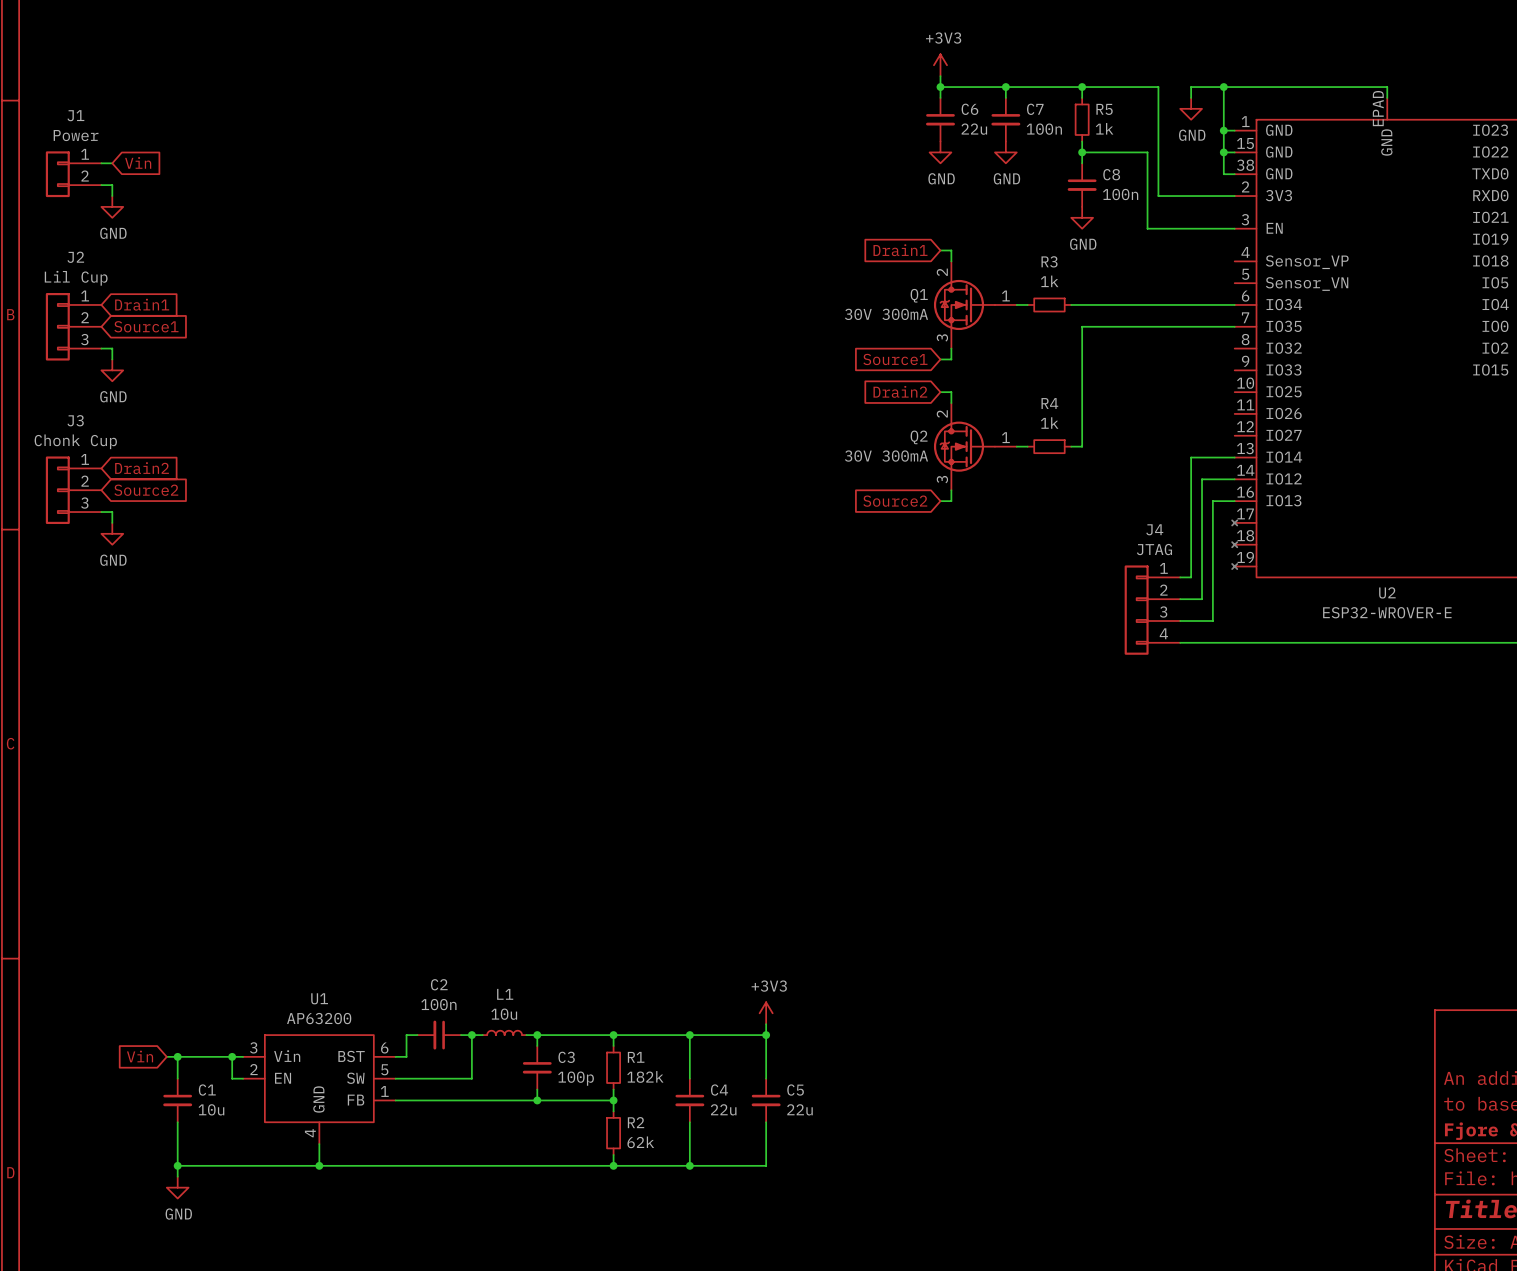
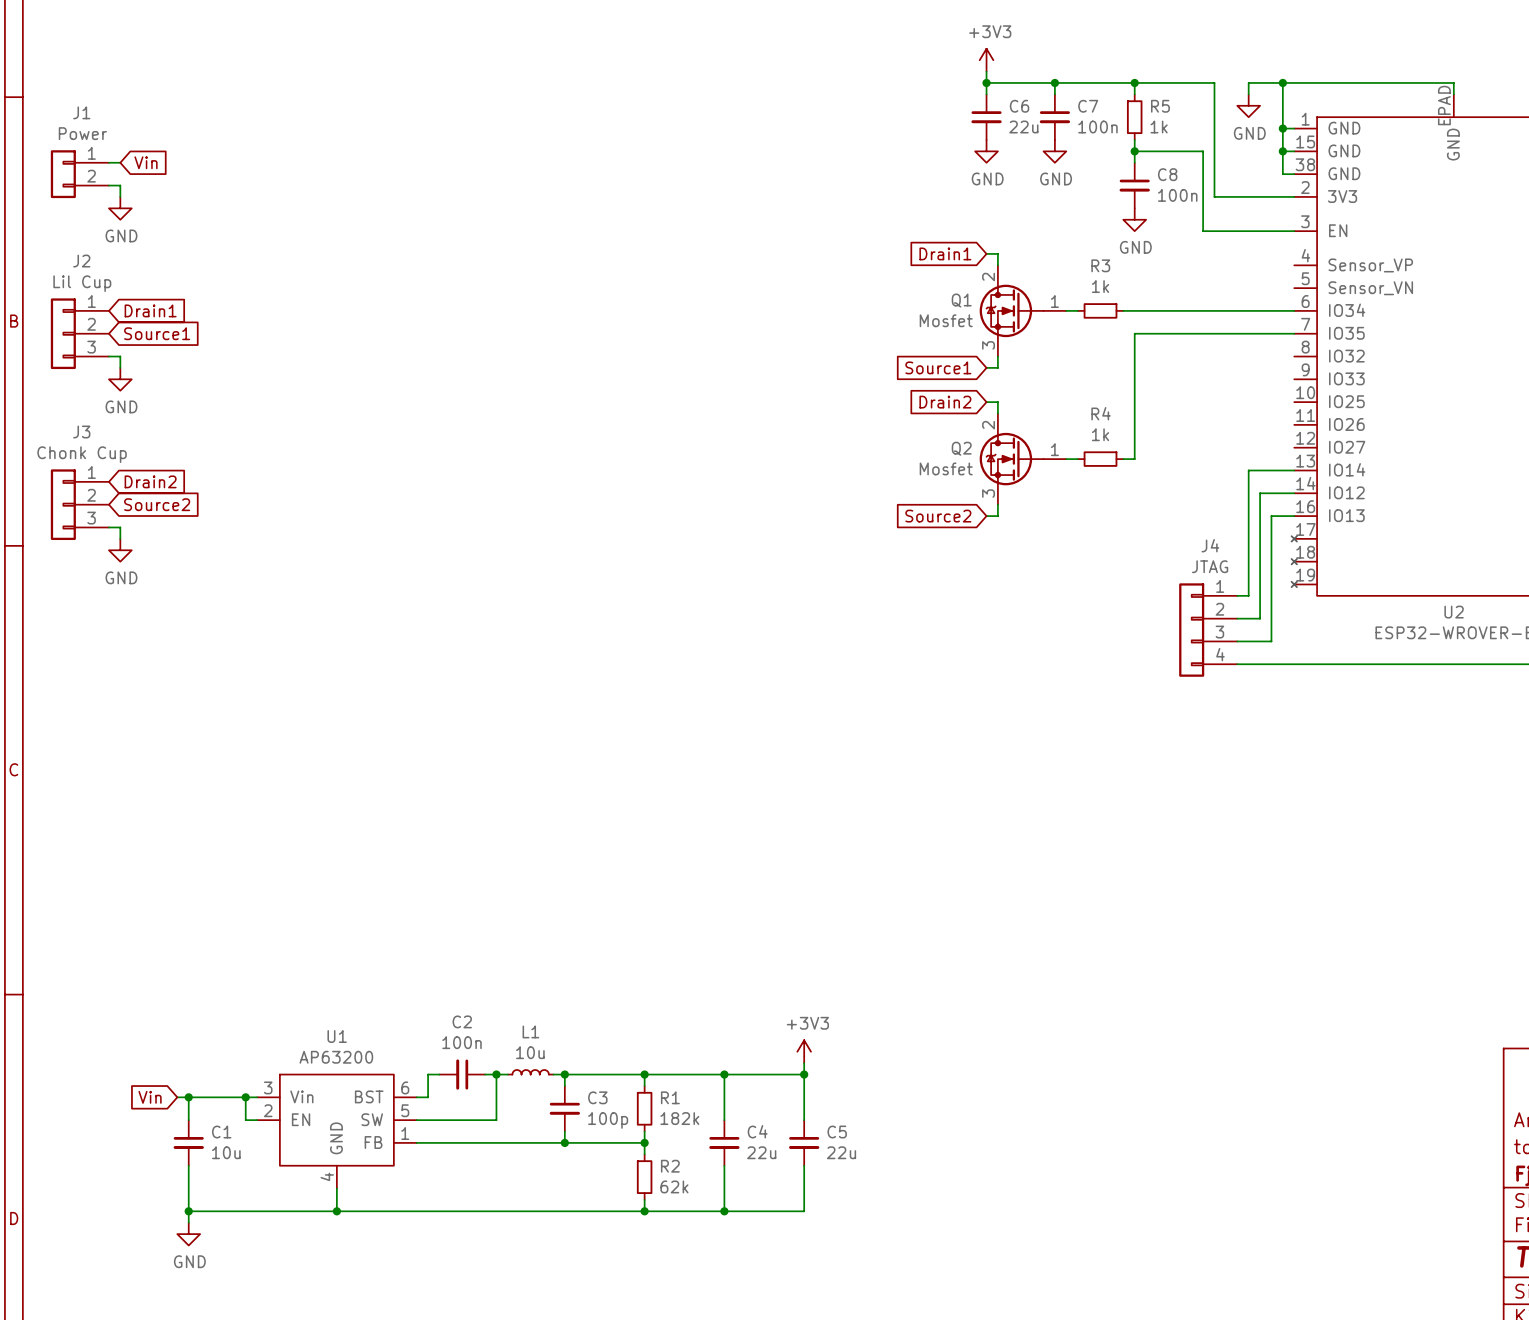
Q1 value: 30V 300mA (886, 314) -> Mosfet (946, 320)
Q2 value: 30V 300mA (886, 456) -> Mosfet (946, 468)

